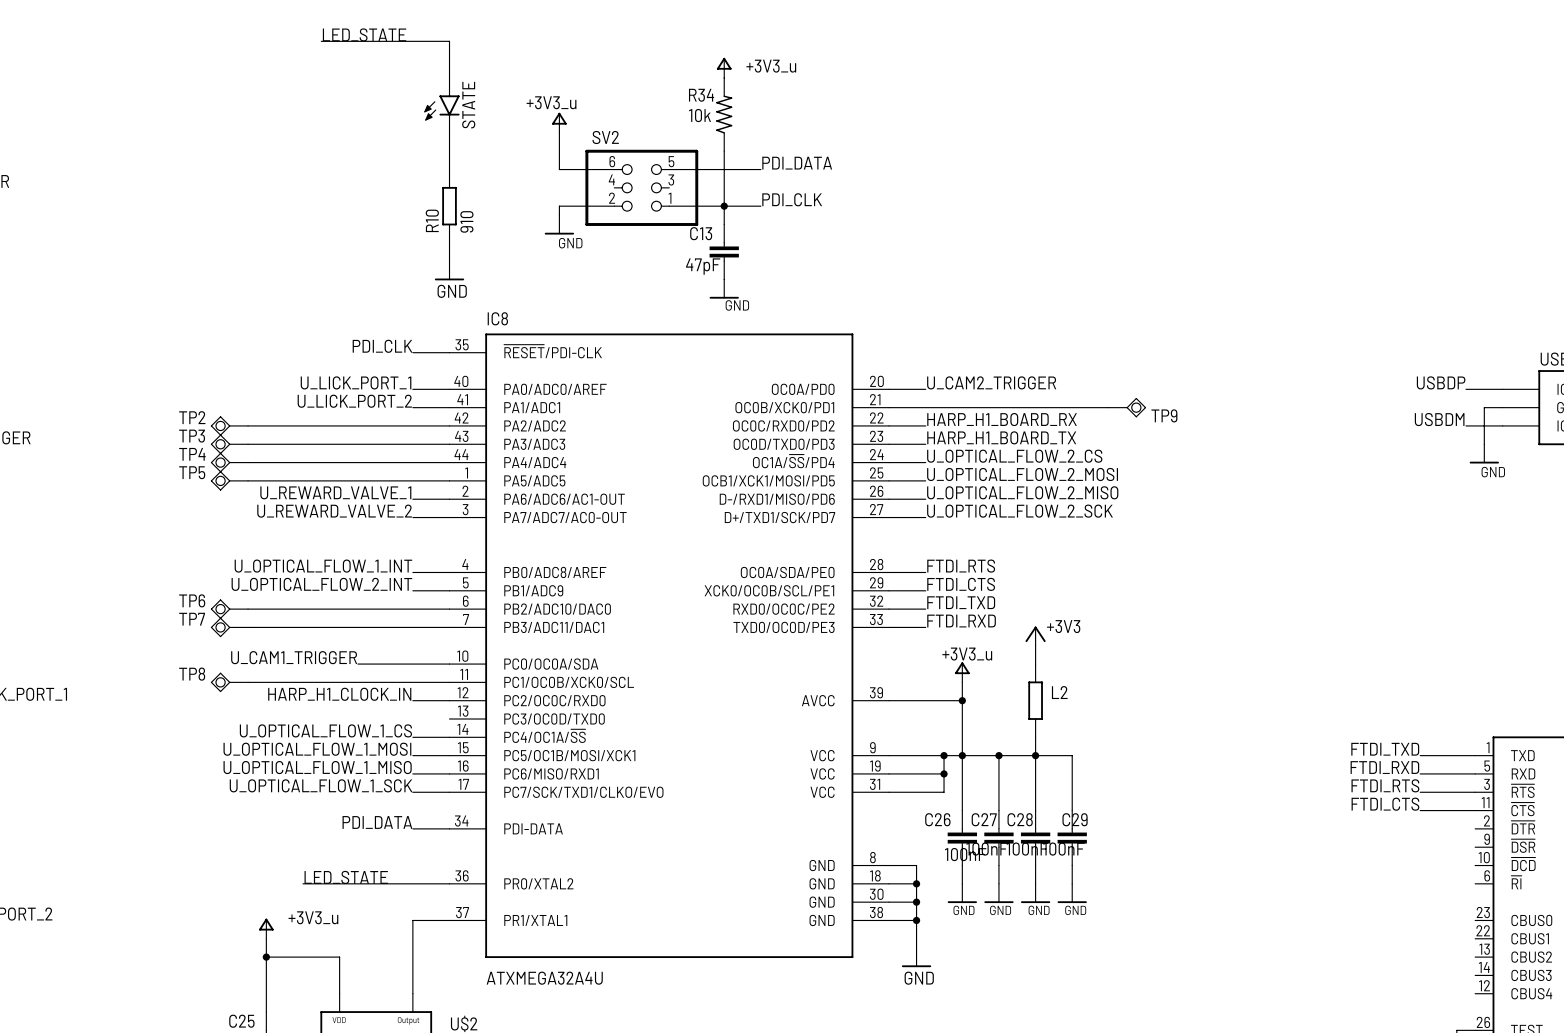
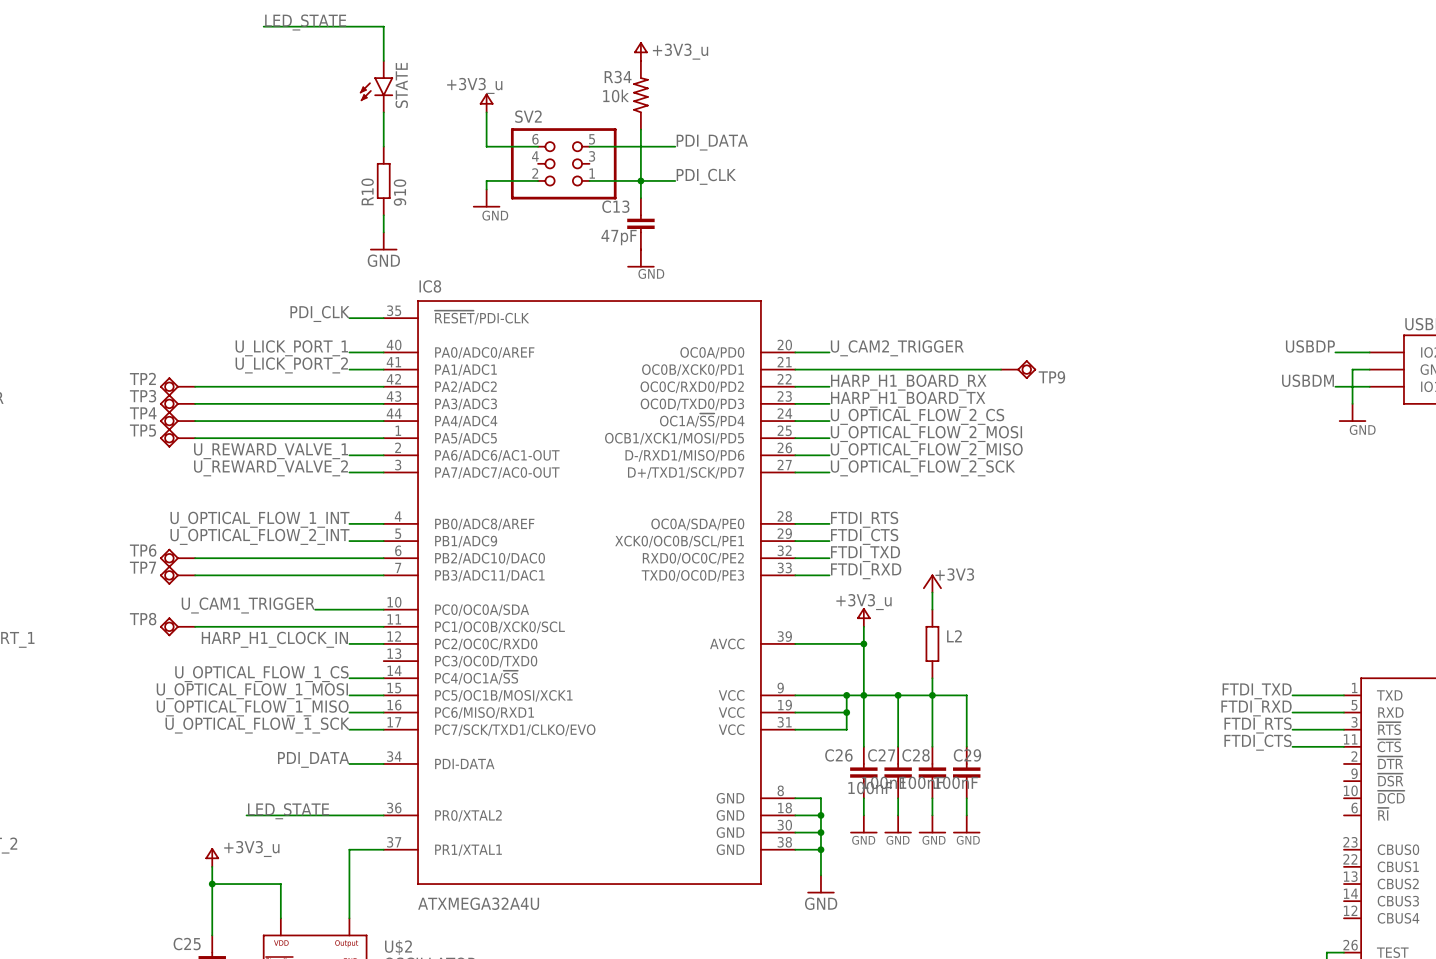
label position: U_CAM1_TRIGGER (294, 657) -> U_CAM1_TRIGGER (248, 605)
wire: (357, 664) (376, 664) -> none

